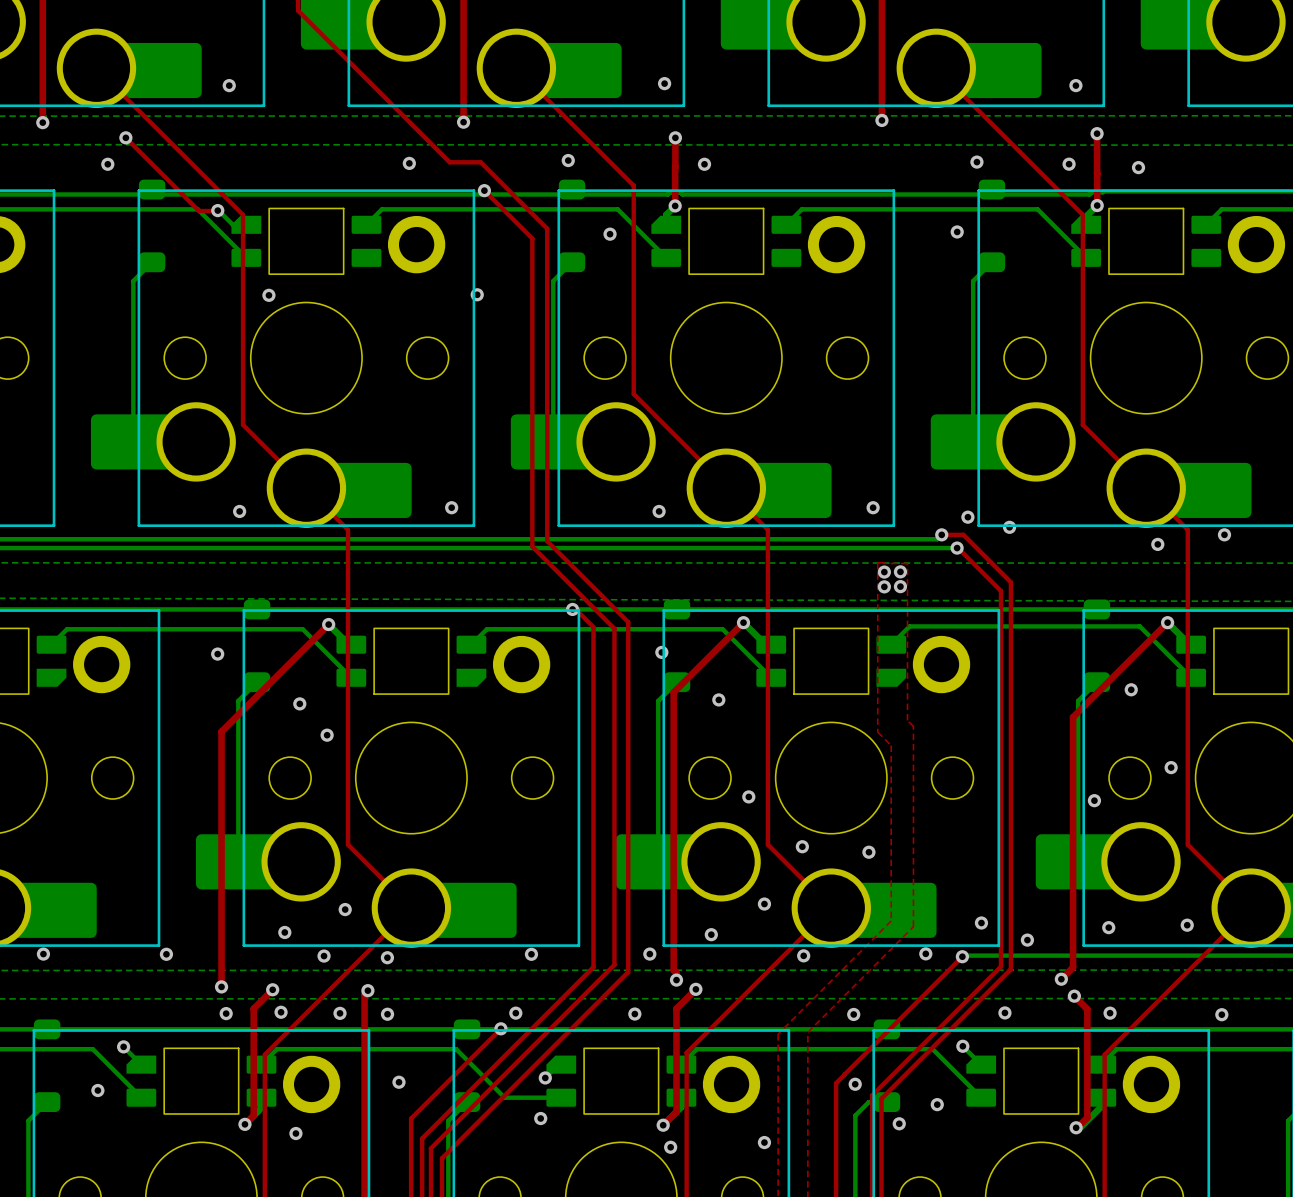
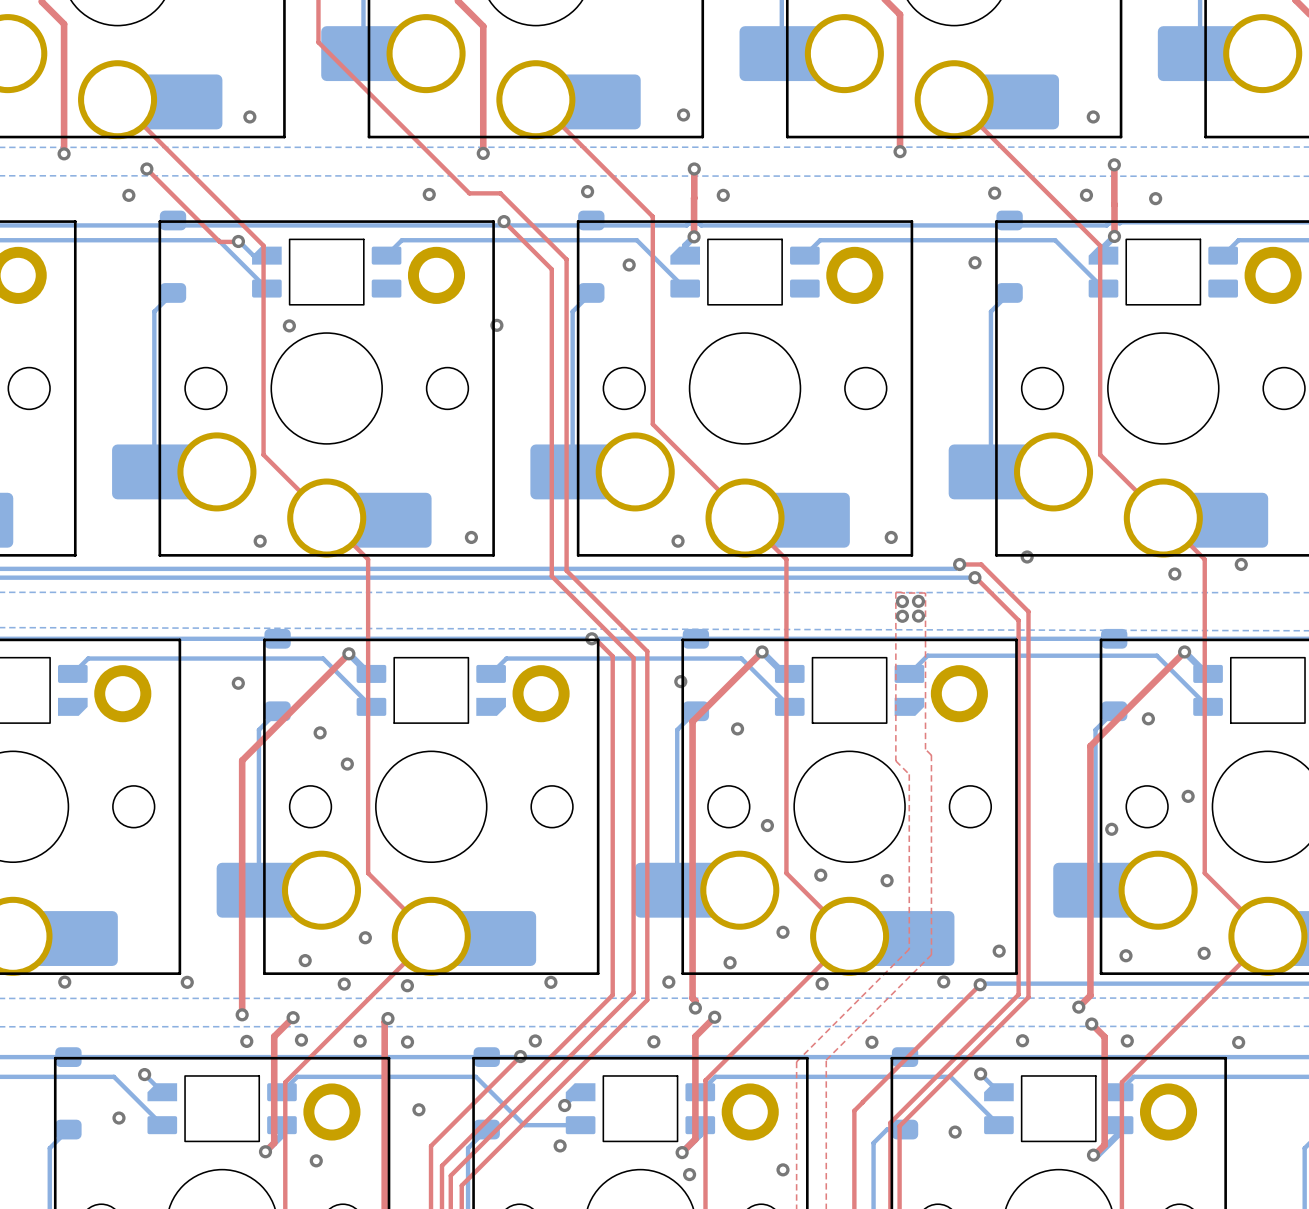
via: (967, 517) -> none
via: (1027, 940) -> none
via: (855, 1084) -> none
via: (899, 1123) -> none

